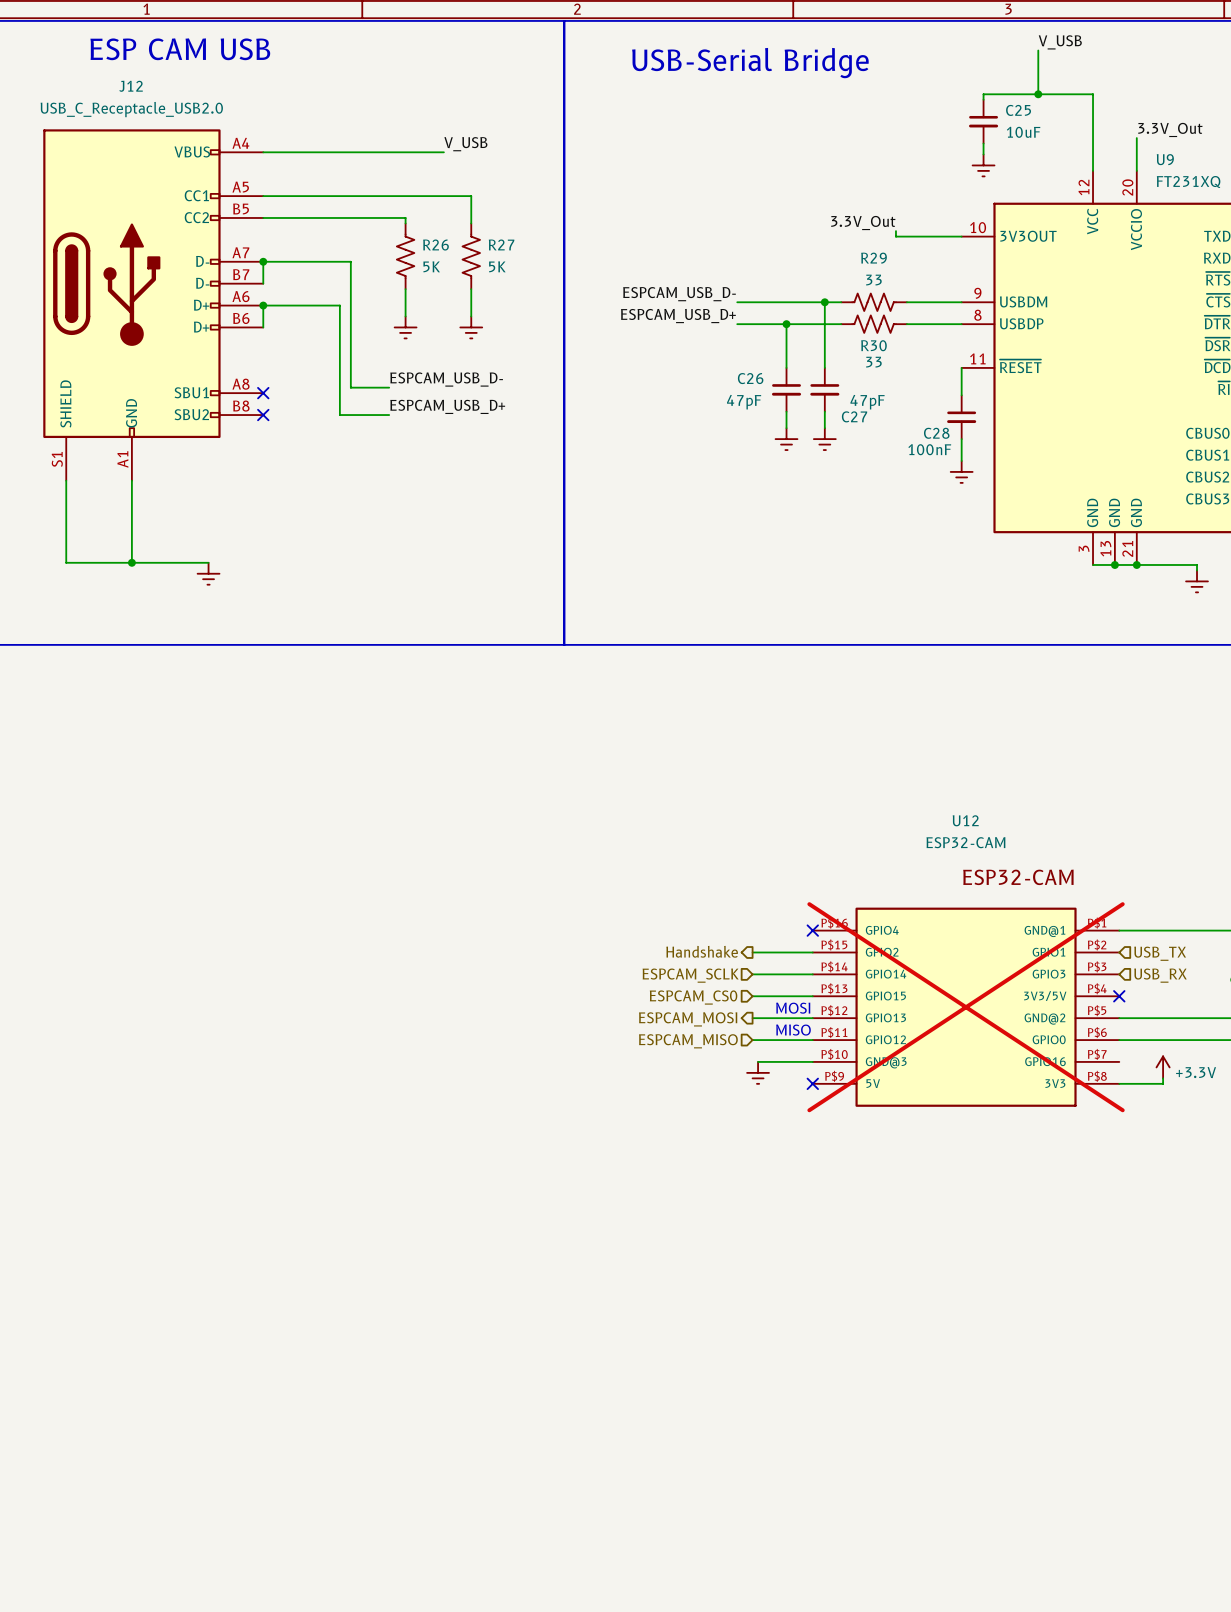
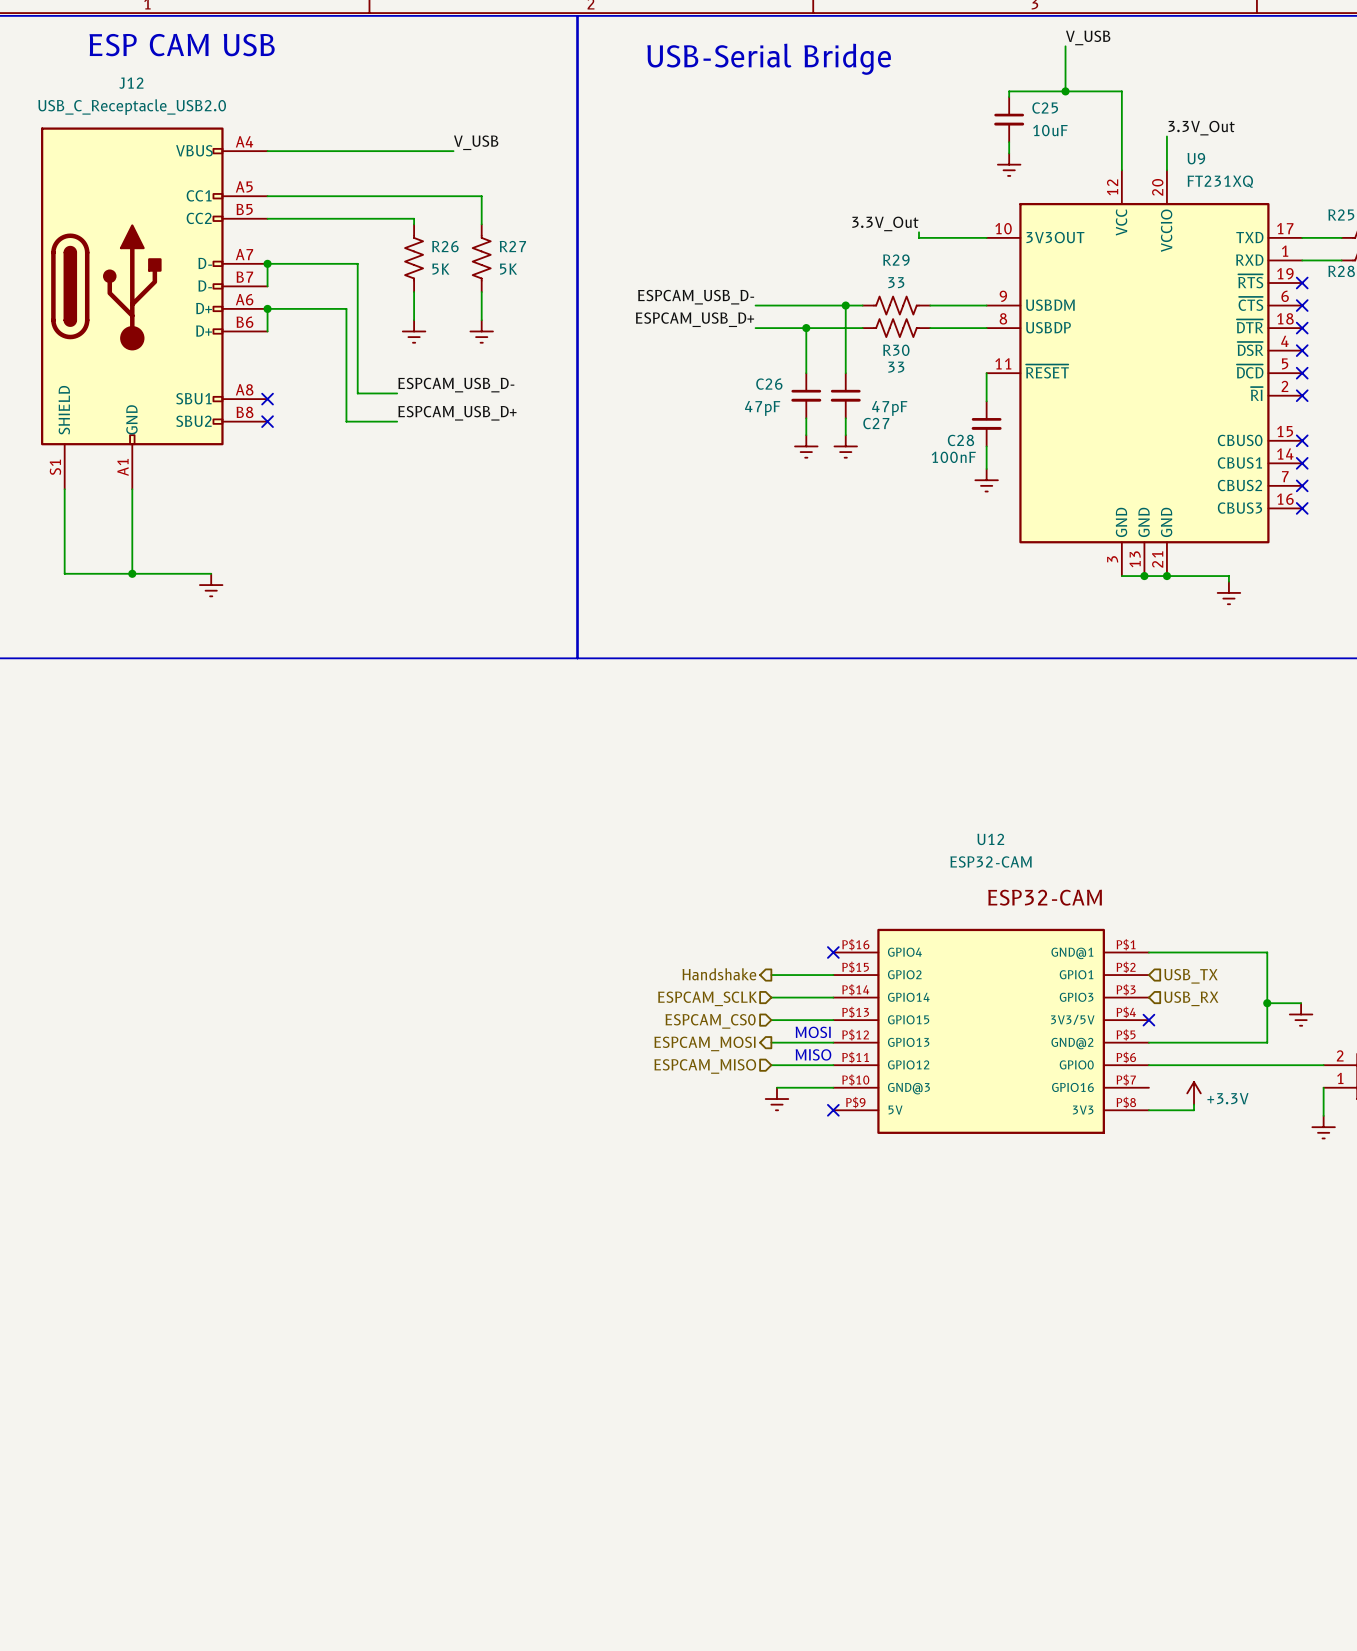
U12 do-not-place cross: (966, 1007) -> none

